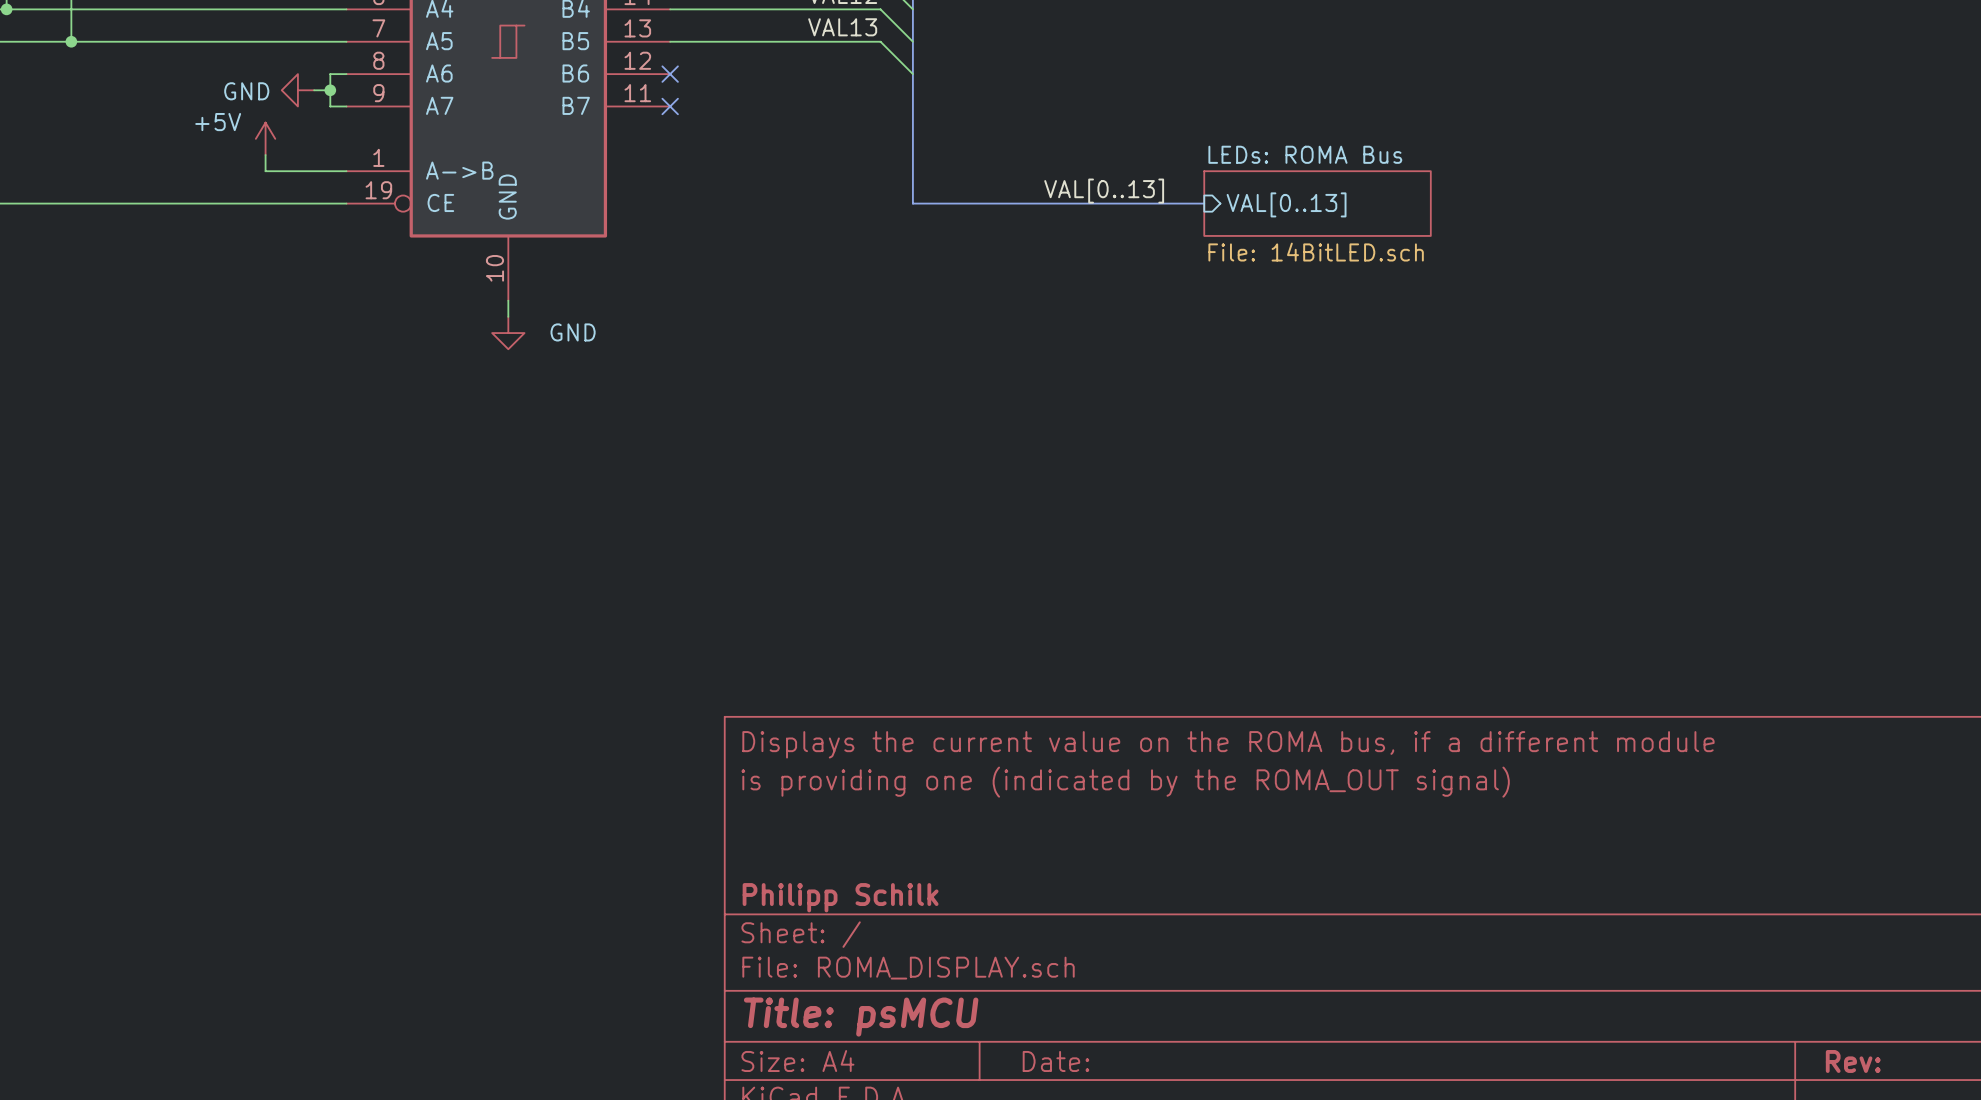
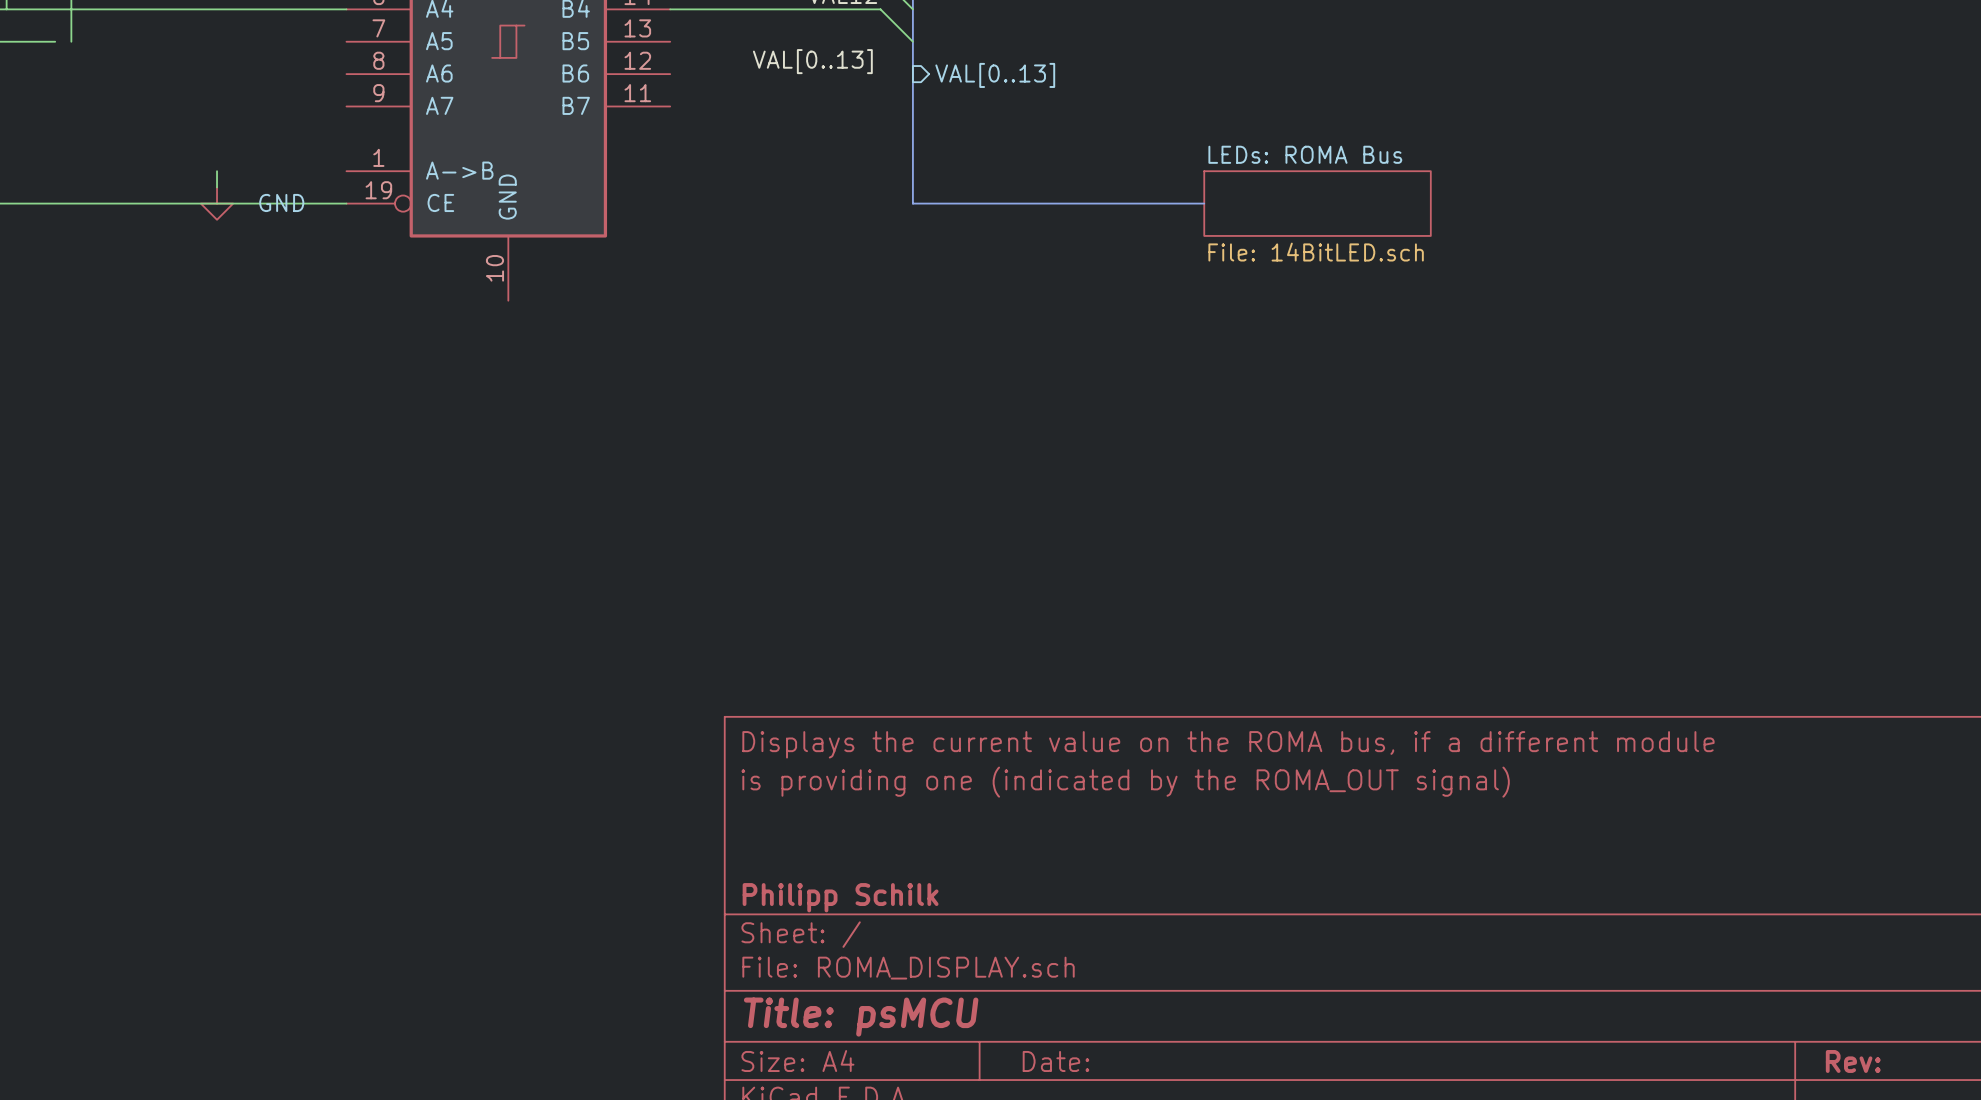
junction: (6, 9) -> none
label: VAL13 (842, 27) -> VAL[0..13] (812, 61)
wire: (55, 41) (346, 41) -> none
junction: (71, 41) -> none
wire: (670, 41) (880, 41) (912, 74) -> none
wire: (346, 74) (330, 74) (330, 106) (346, 106) -> none
no-connect mark: (670, 74) -> none
sheet pin: none -> VAL[0..13] (995, 75)
power symbol rotation: 0° (297, 90) -> 90° counterclockwise (217, 203)
power symbol position: GND (297, 90) -> GND (217, 203)
wire: (314, 90) (330, 90) -> none
junction: (330, 90) -> none
power symbol text position: GND (246, 91) -> GND (281, 202)
no-connect mark: (670, 106) -> none
power symbol: +5V (265, 138) -> none
wire: (265, 155) (265, 171) (346, 171) -> none
wire: none -> (217, 171) (217, 187)
label: VAL[0..13] (1104, 191) -> none
sheet pin: VAL[0..13] (1286, 204) -> none
wire: (508, 300) (508, 316) -> none
power symbol: GND (508, 333) -> none

